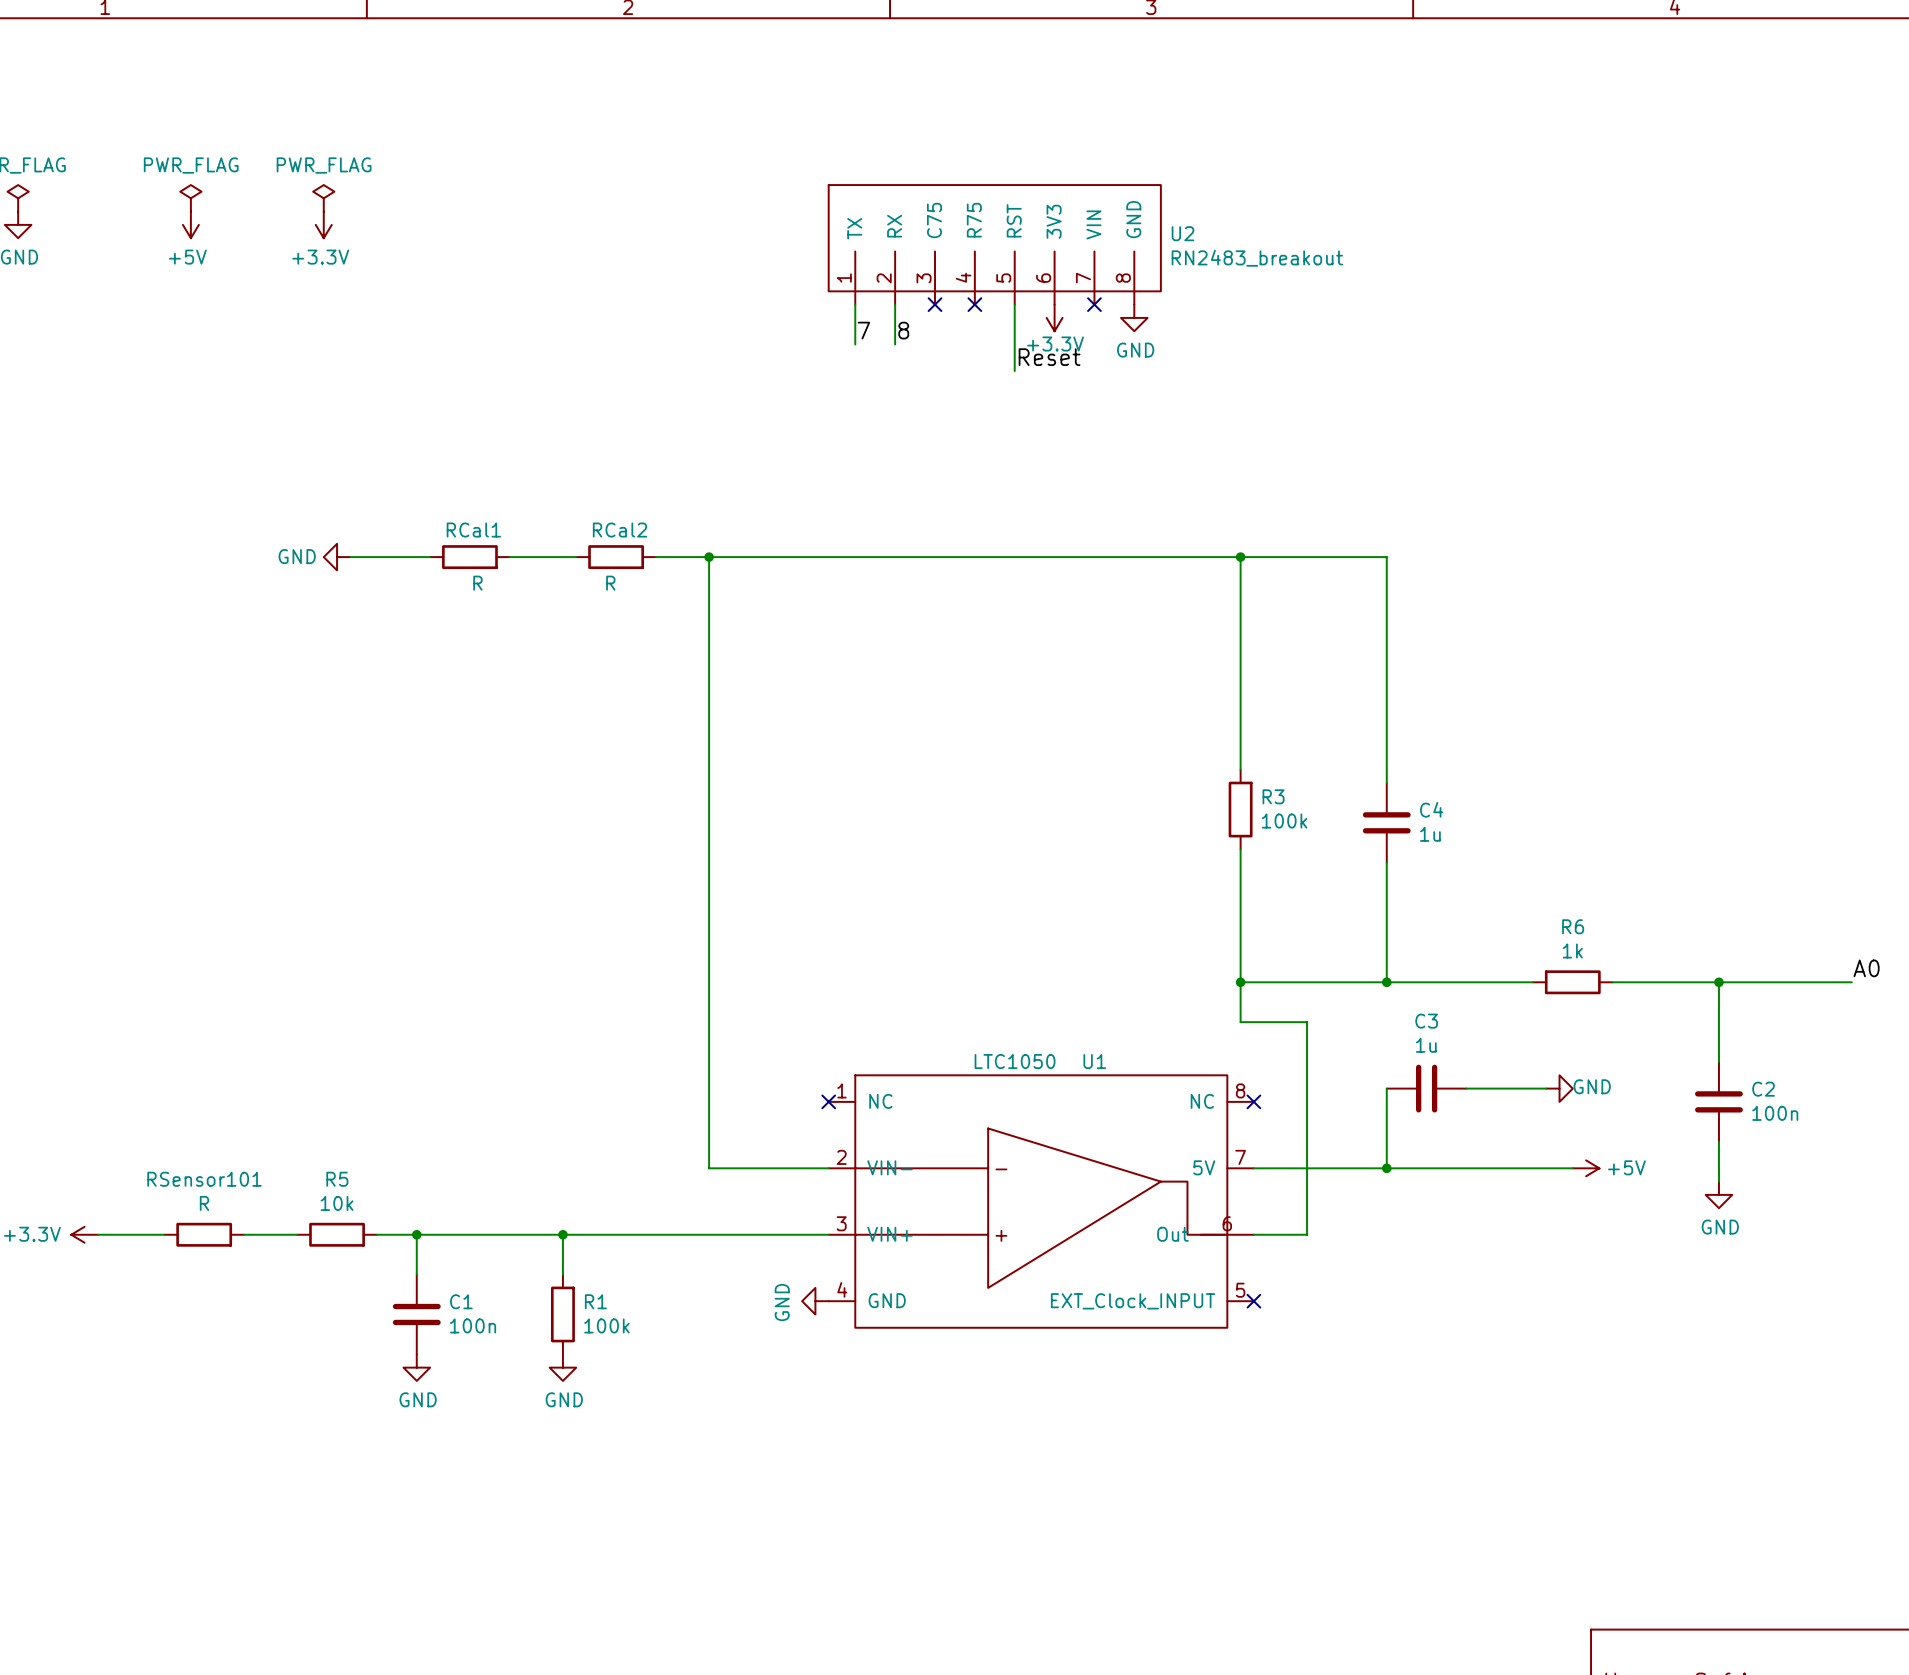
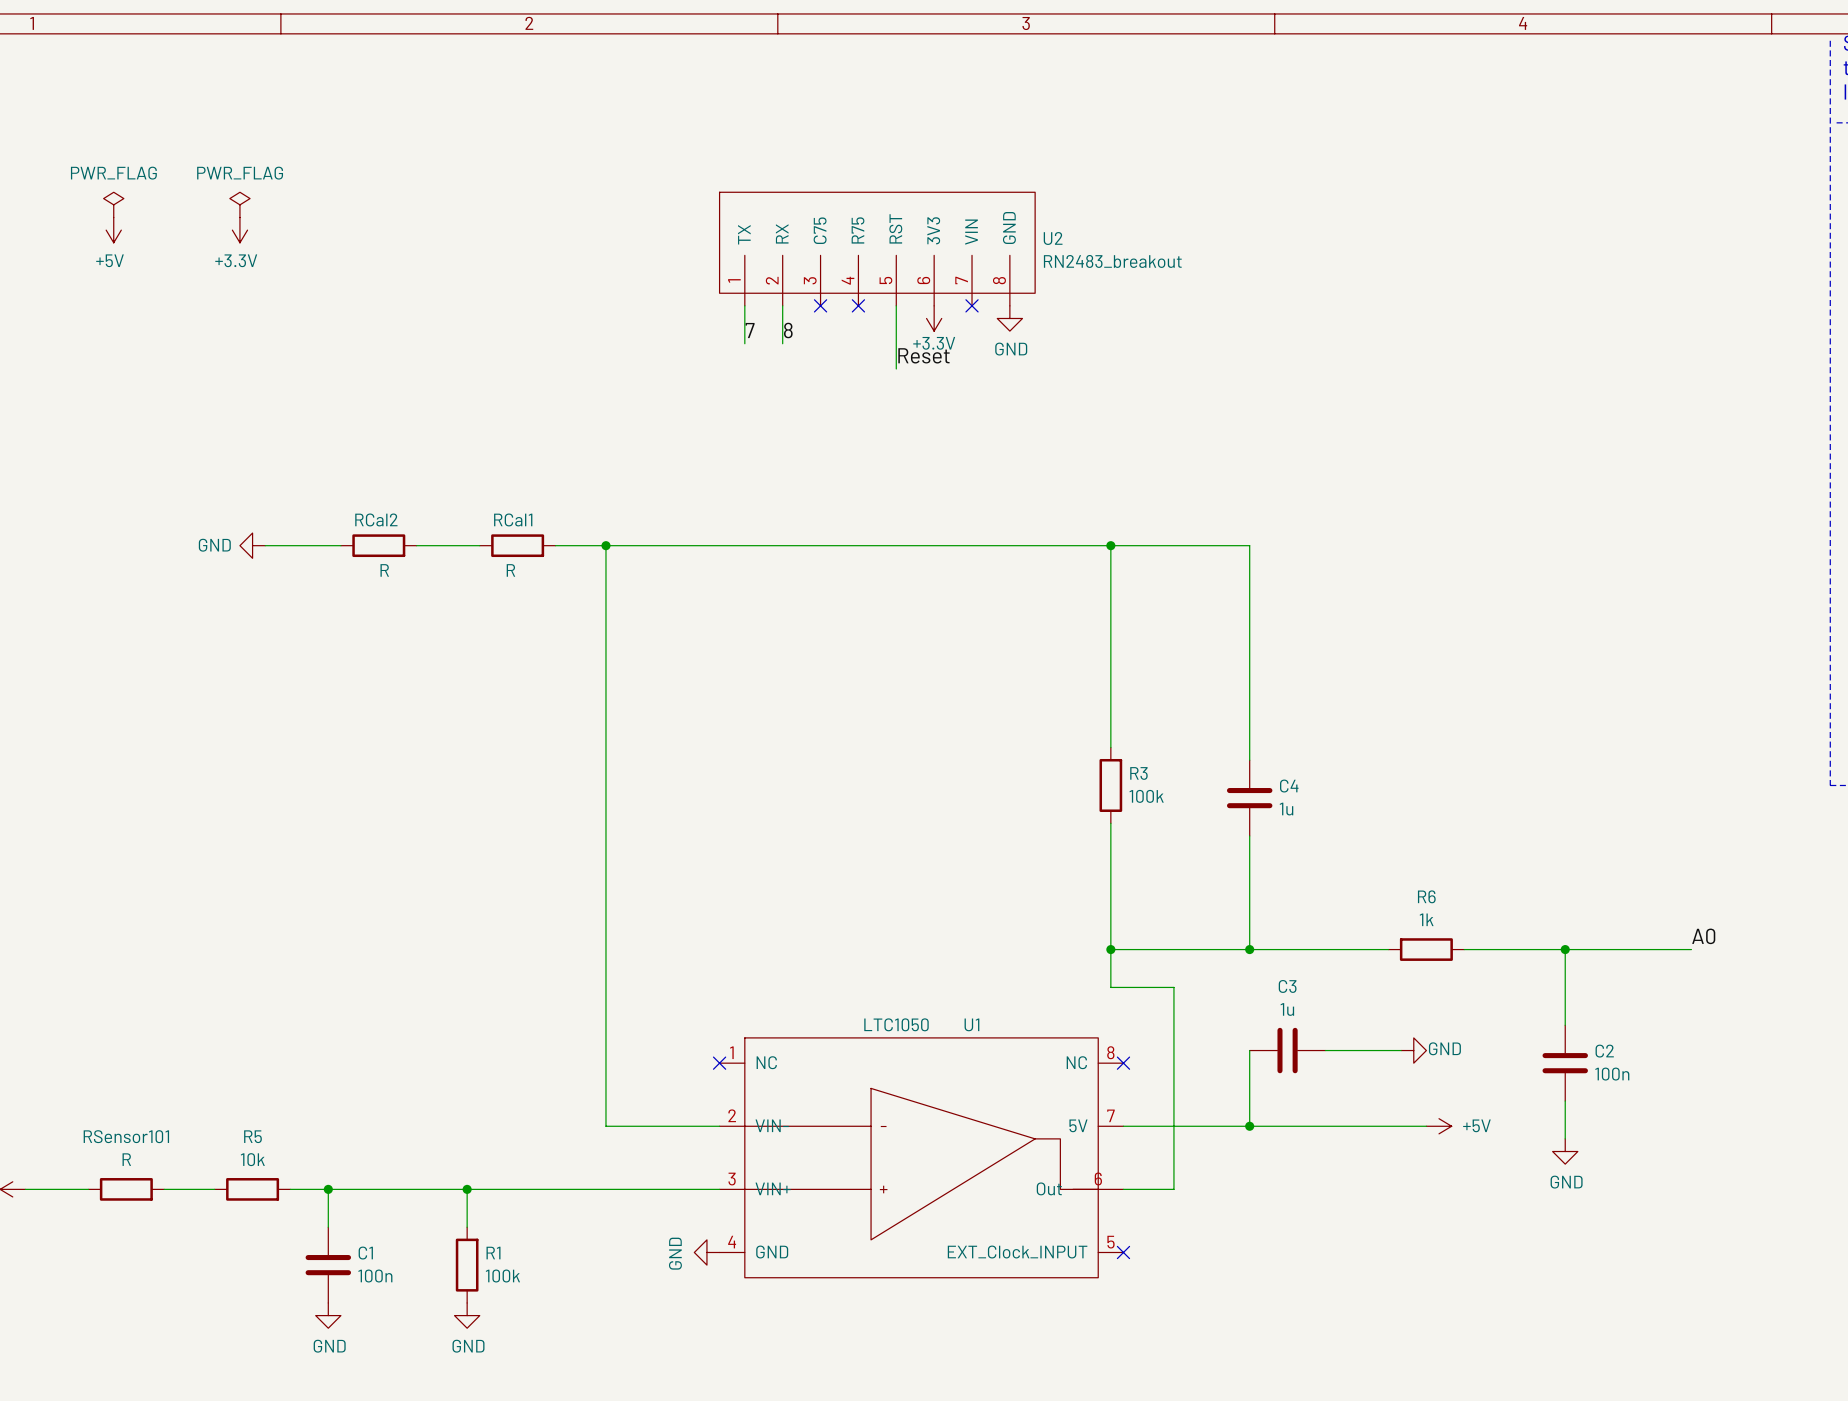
RCal1 name: RCal1 (473, 530) -> RCal2 (376, 519)
RCal2 name: RCal2 (619, 530) -> RCal1 (513, 519)

